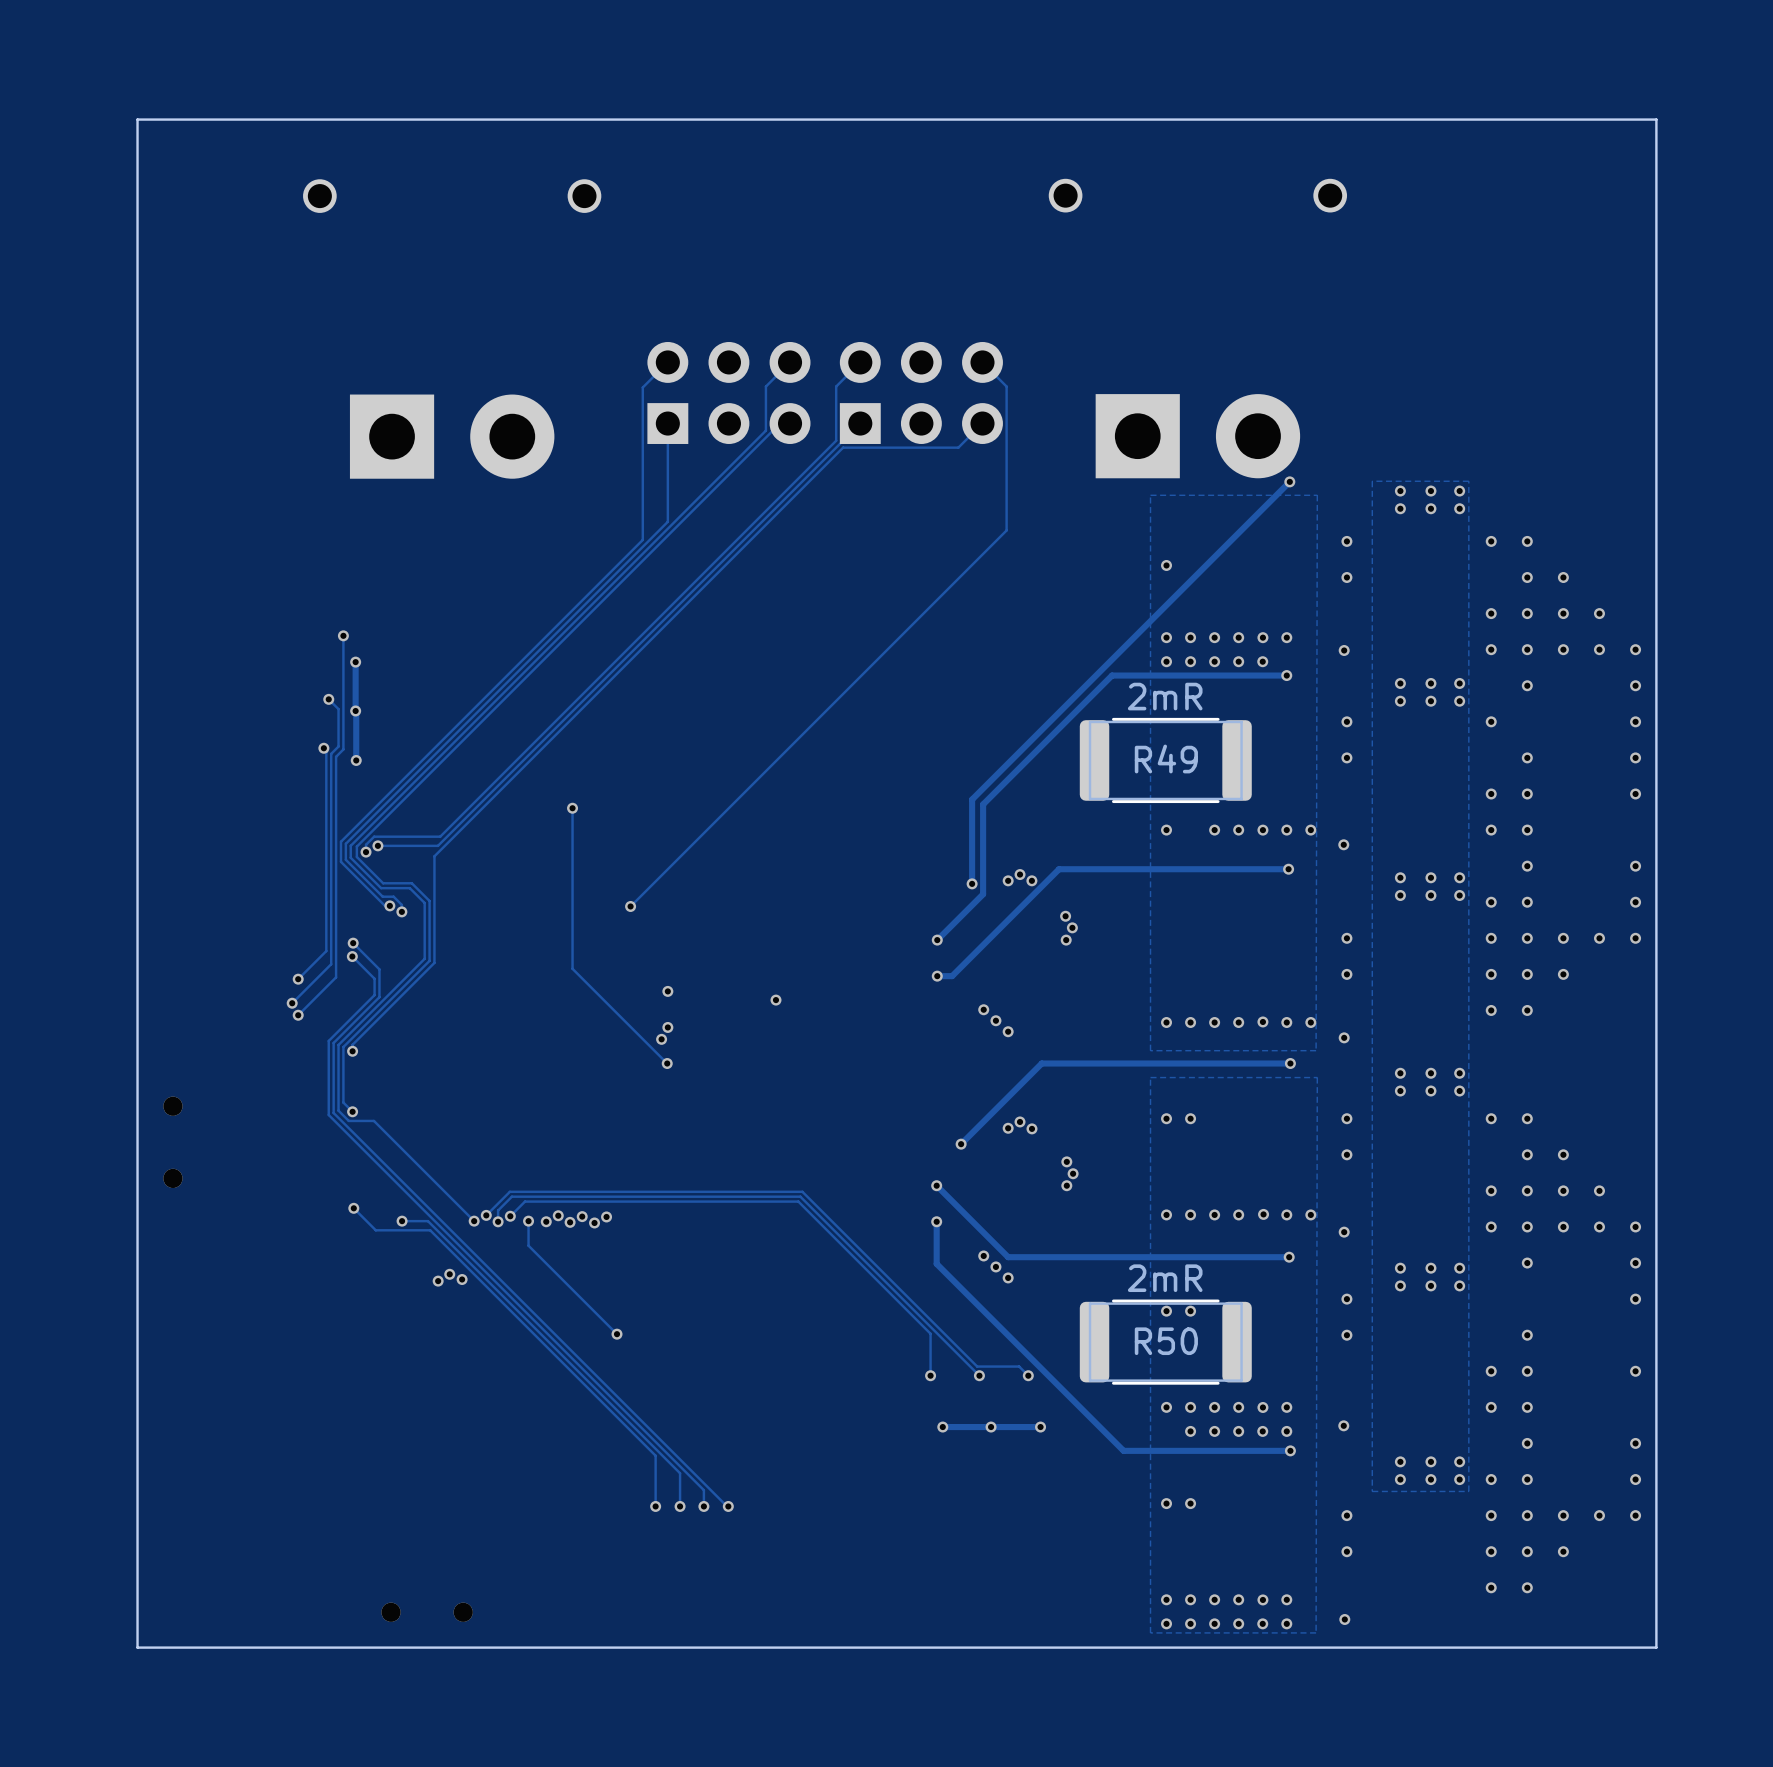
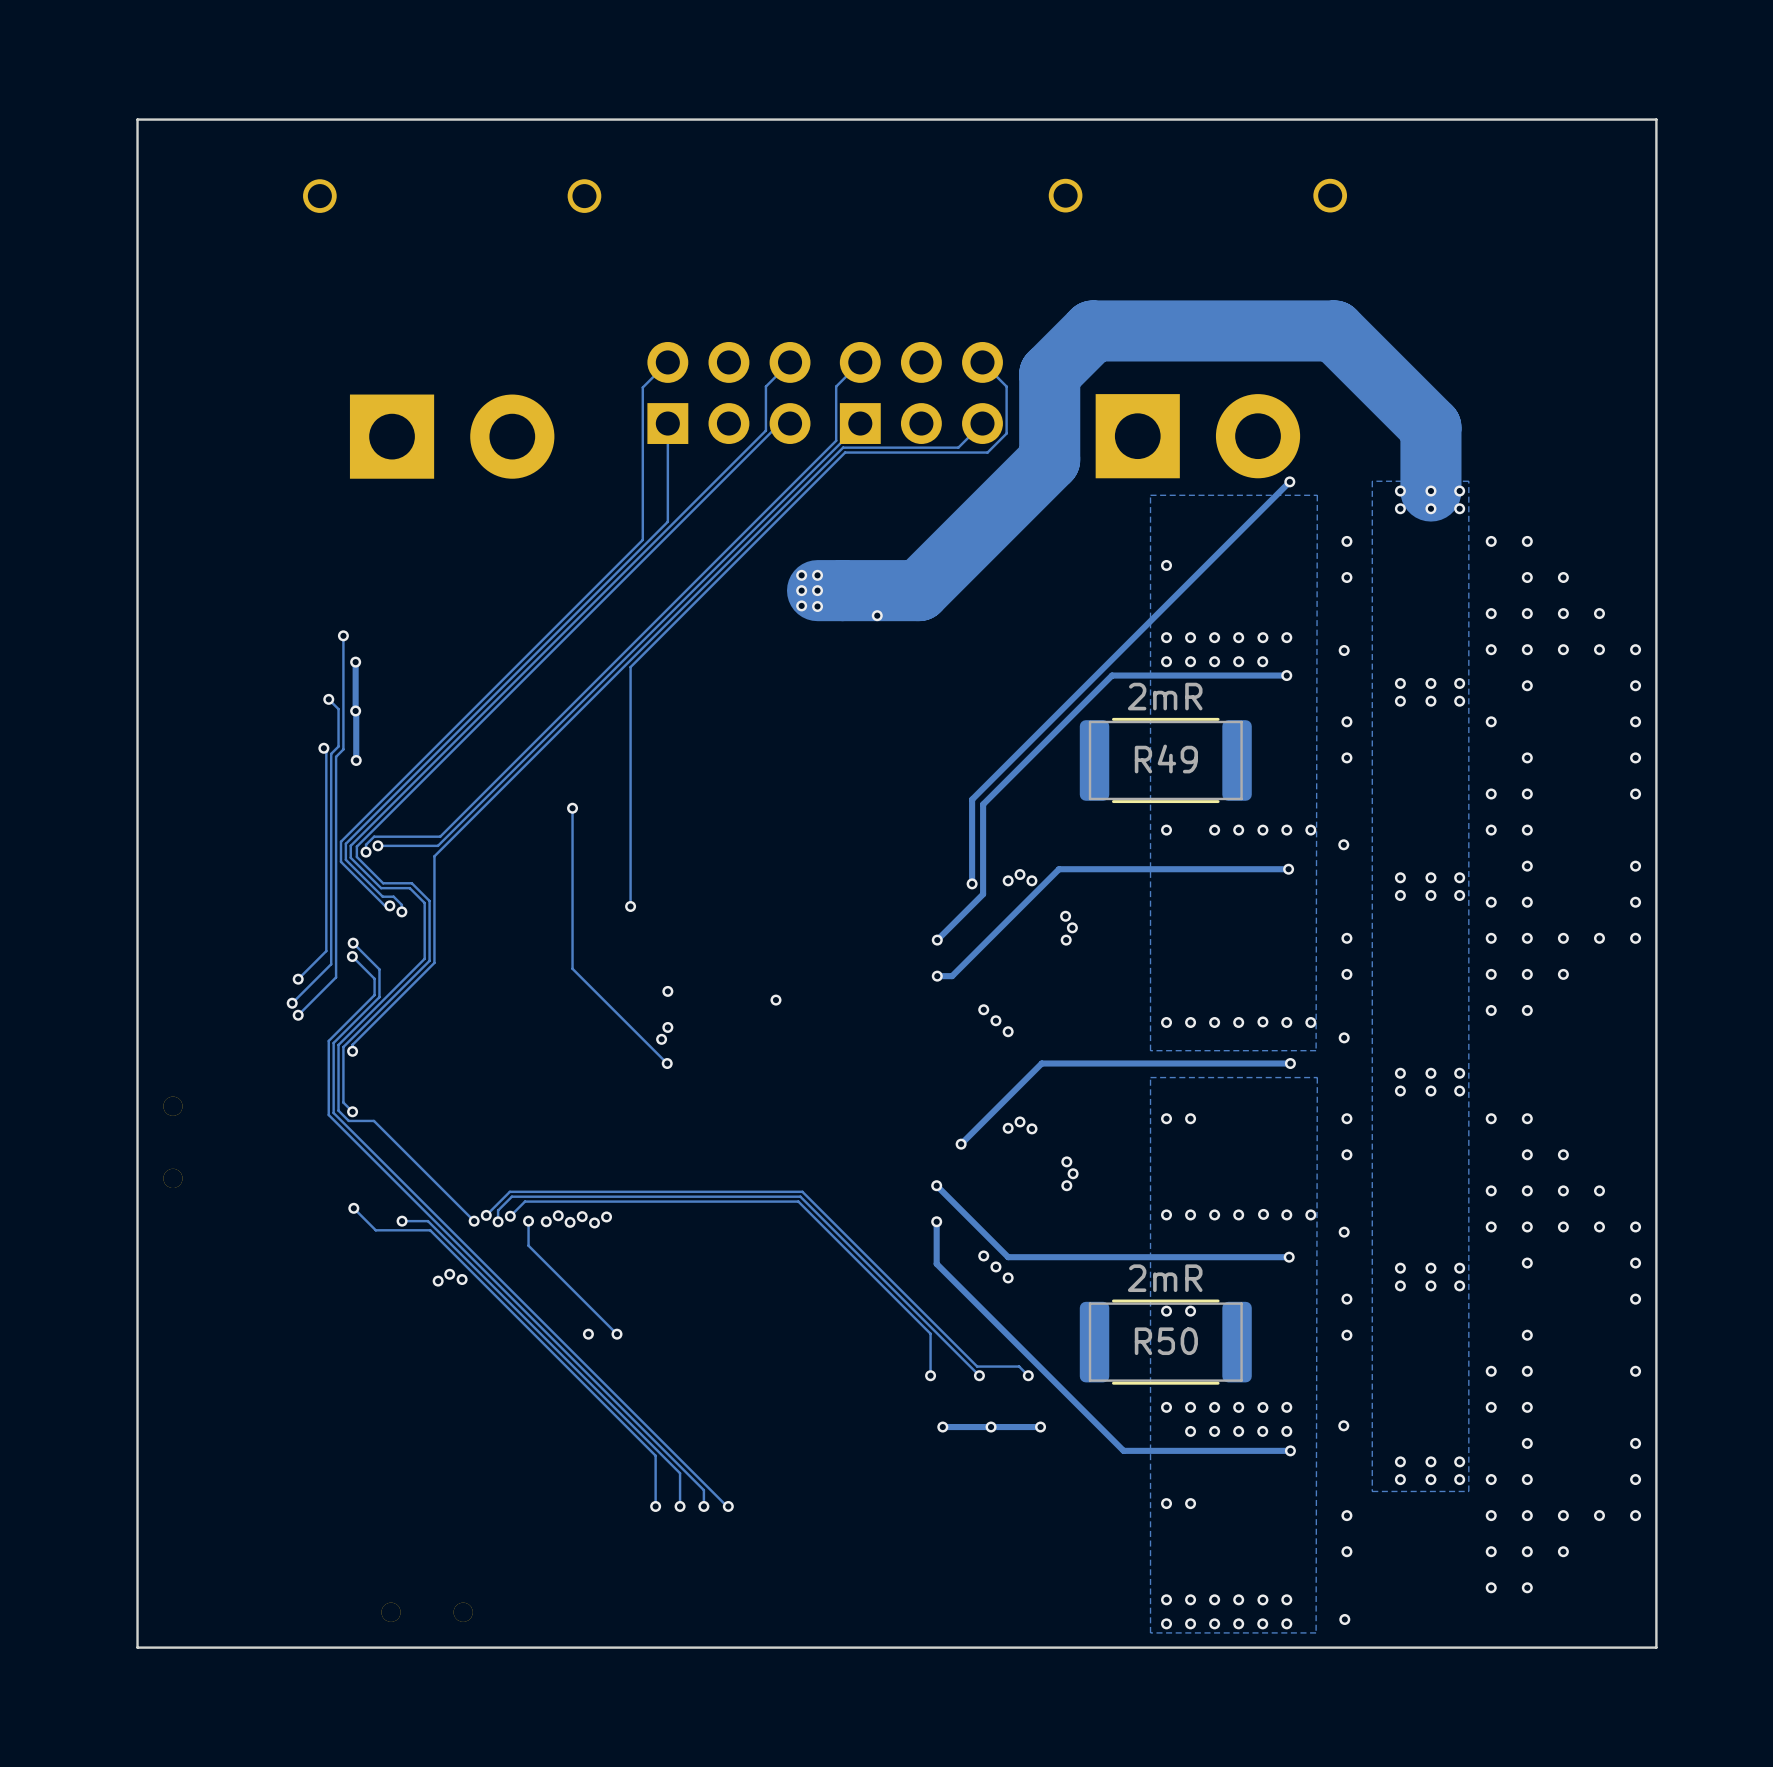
track: (1006, 433) (1006, 530) (630, 906) -> (1006, 433) (987, 452) (845, 452) (630, 667) (630, 906)
track: none -> (1430, 491) (1430, 427) (1334, 330) (1092, 330) (1049, 374) (1049, 459) (918, 590) (817, 590)
via: none -> (801, 575)
via: none -> (817, 575)
via: none -> (801, 590)
via: none -> (817, 590)
via: none -> (801, 605)
via: none -> (817, 606)
via: none -> (877, 615)
via: none -> (588, 1334)

